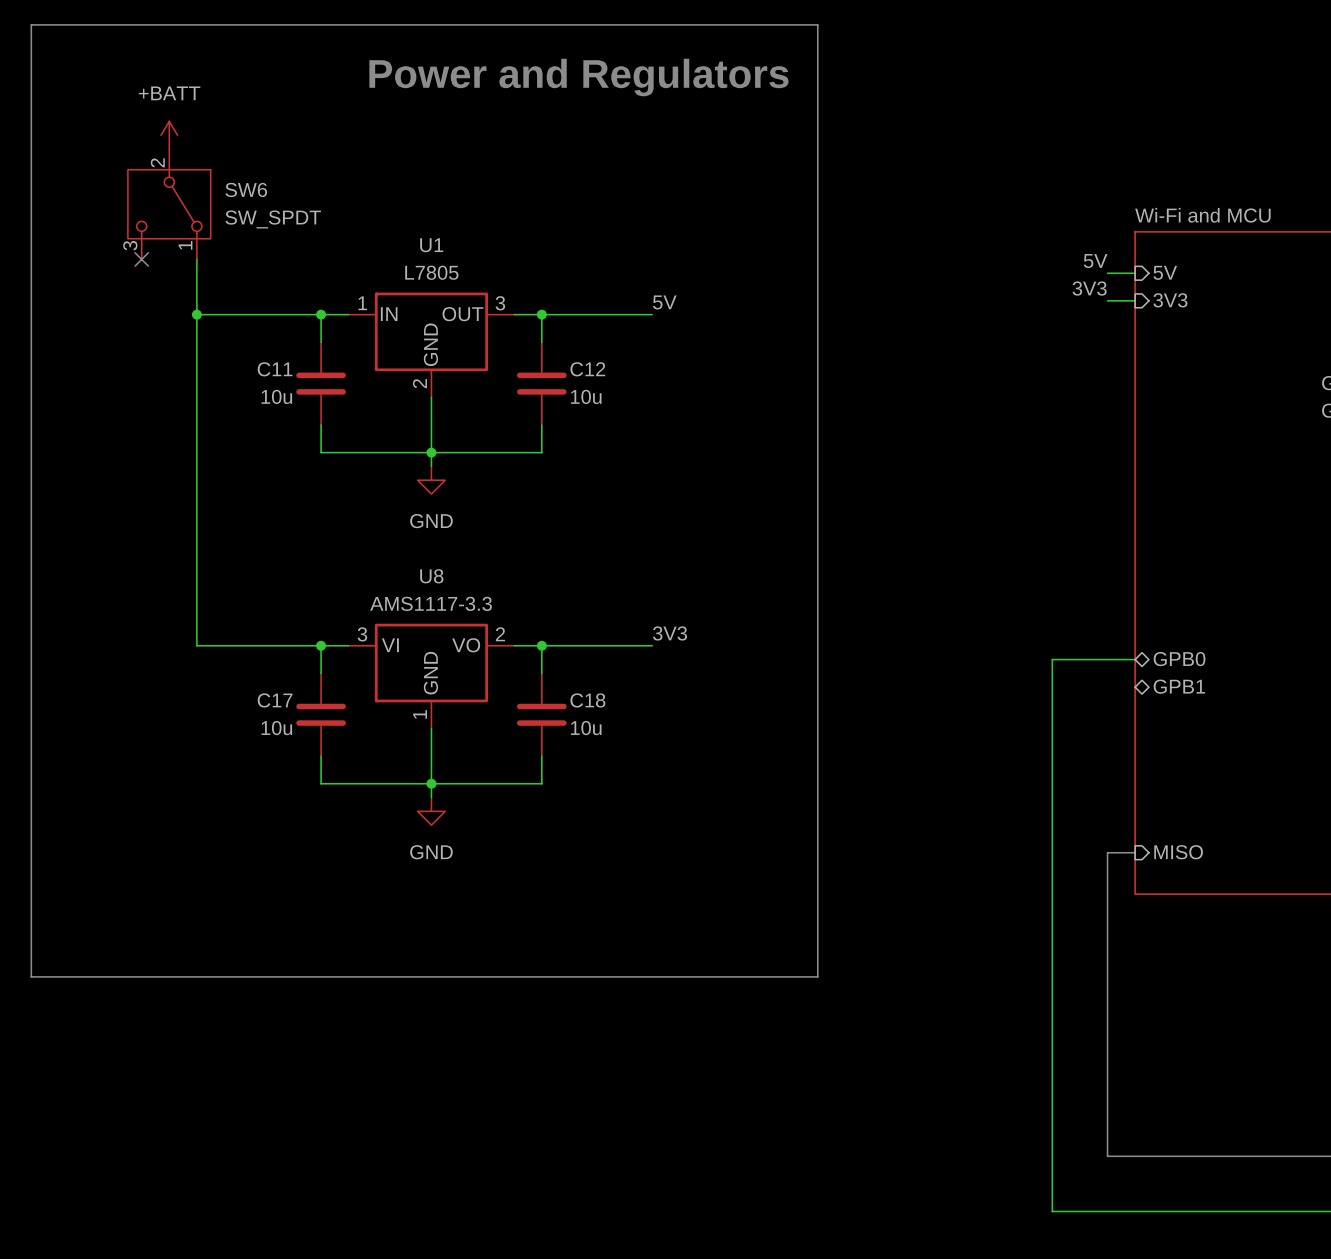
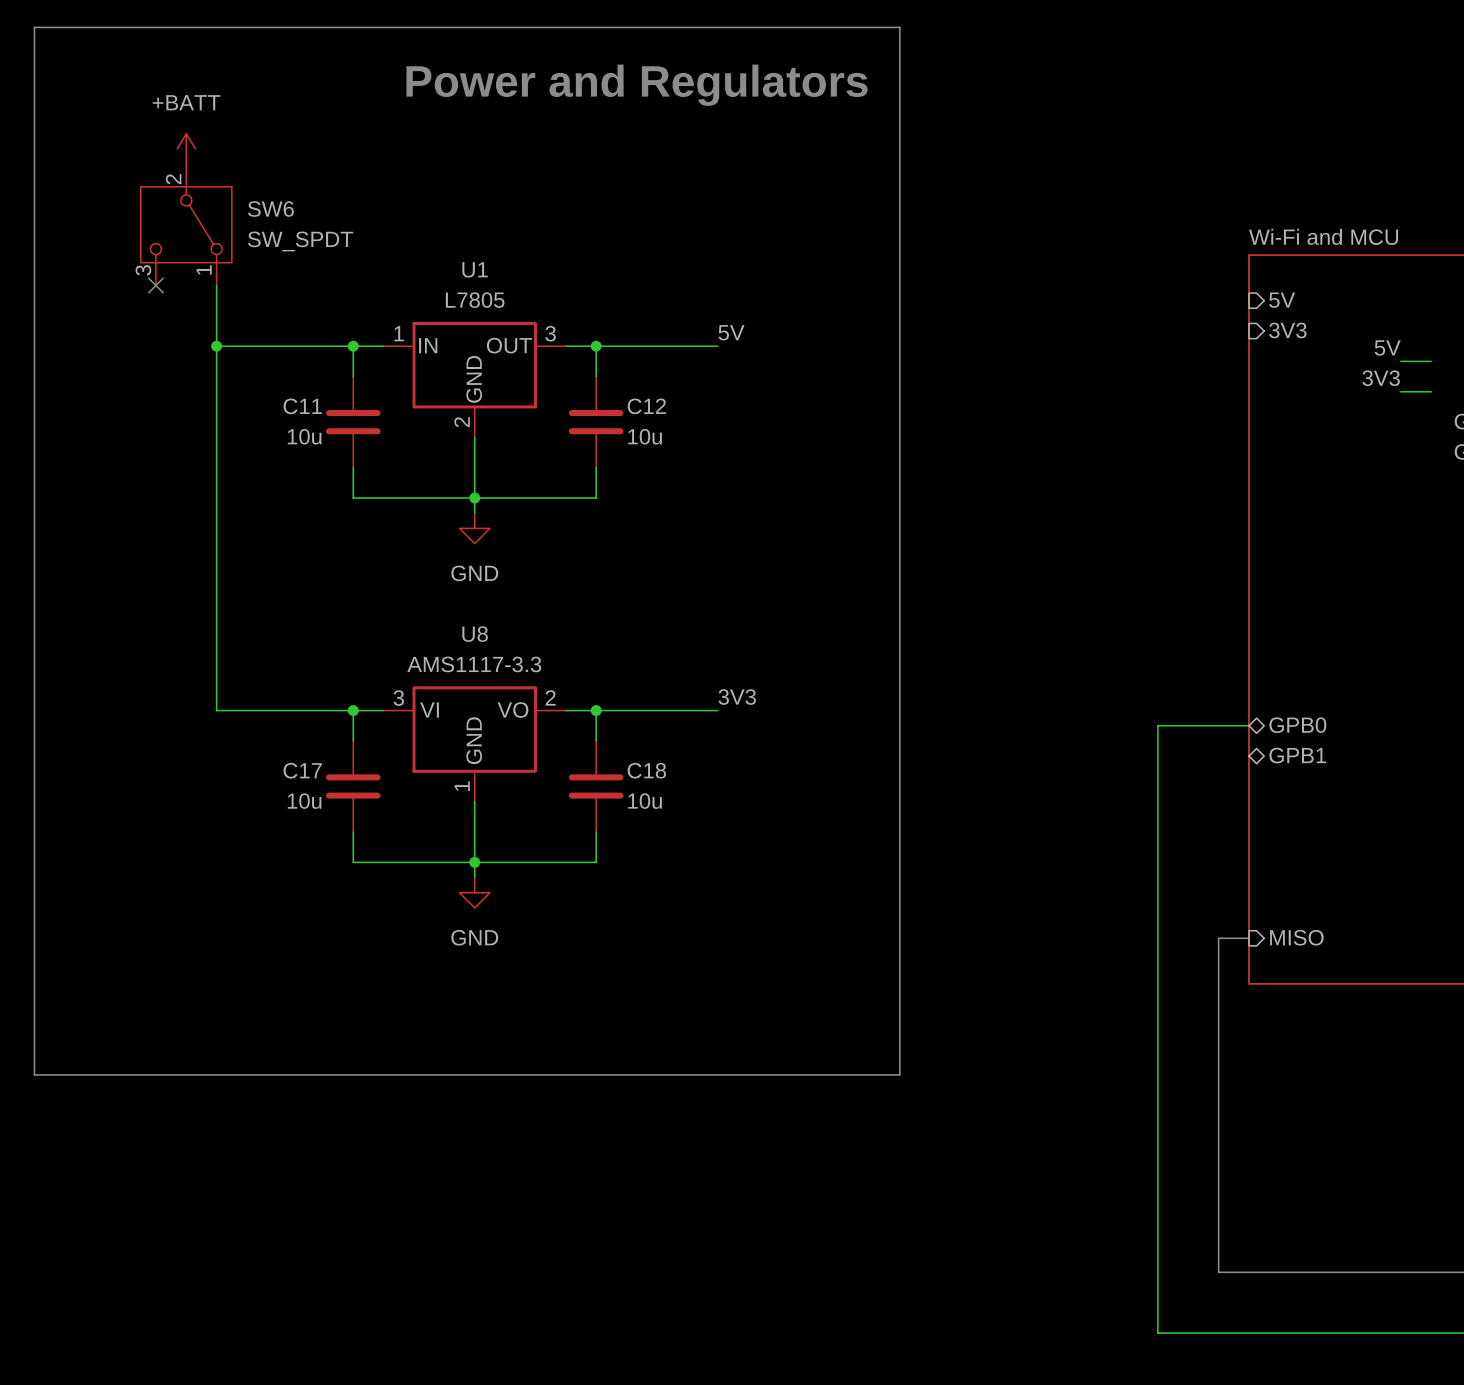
label position: 5V (1095, 261) -> 5V (1387, 347)
wire: (1107, 273) (1135, 273) -> (1400, 361) (1431, 361)
label position: 3V3 (1089, 288) -> 3V3 (1381, 378)
wire: (1107, 300) (1135, 300) -> (1400, 391) (1431, 391)

